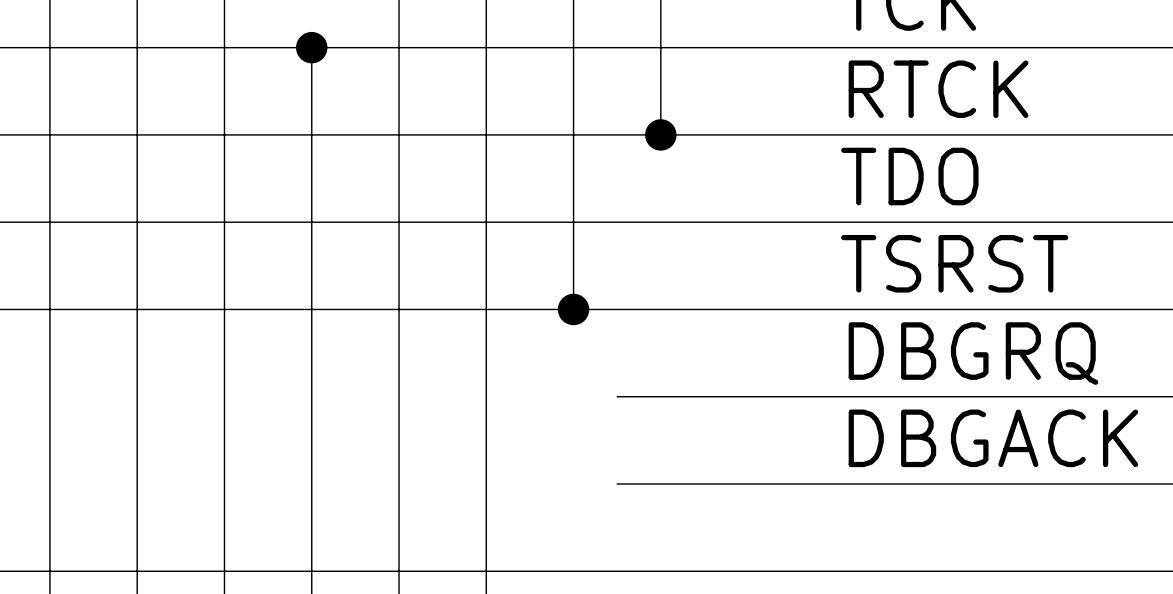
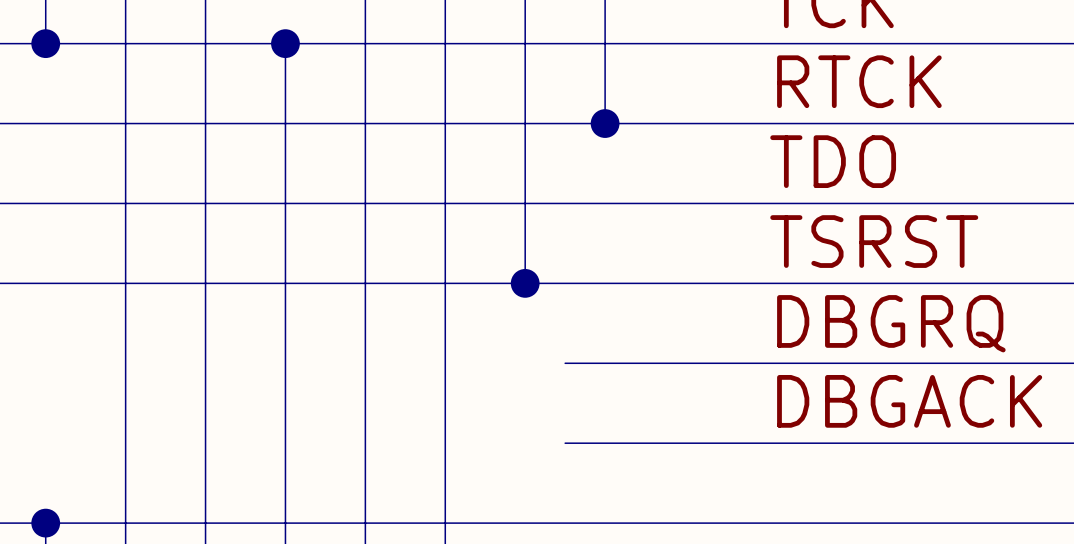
wire: (49, 47) (49, 571) -> none
junction: none -> (45, 43)
junction: none -> (45, 523)

